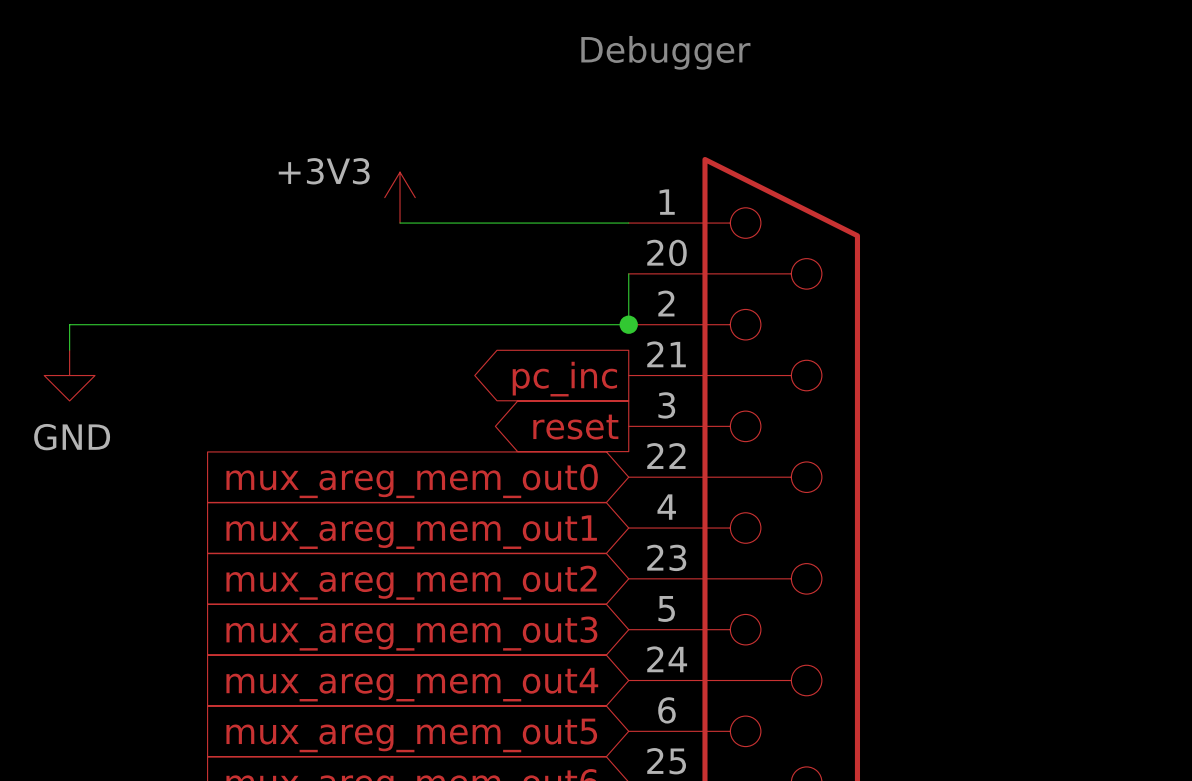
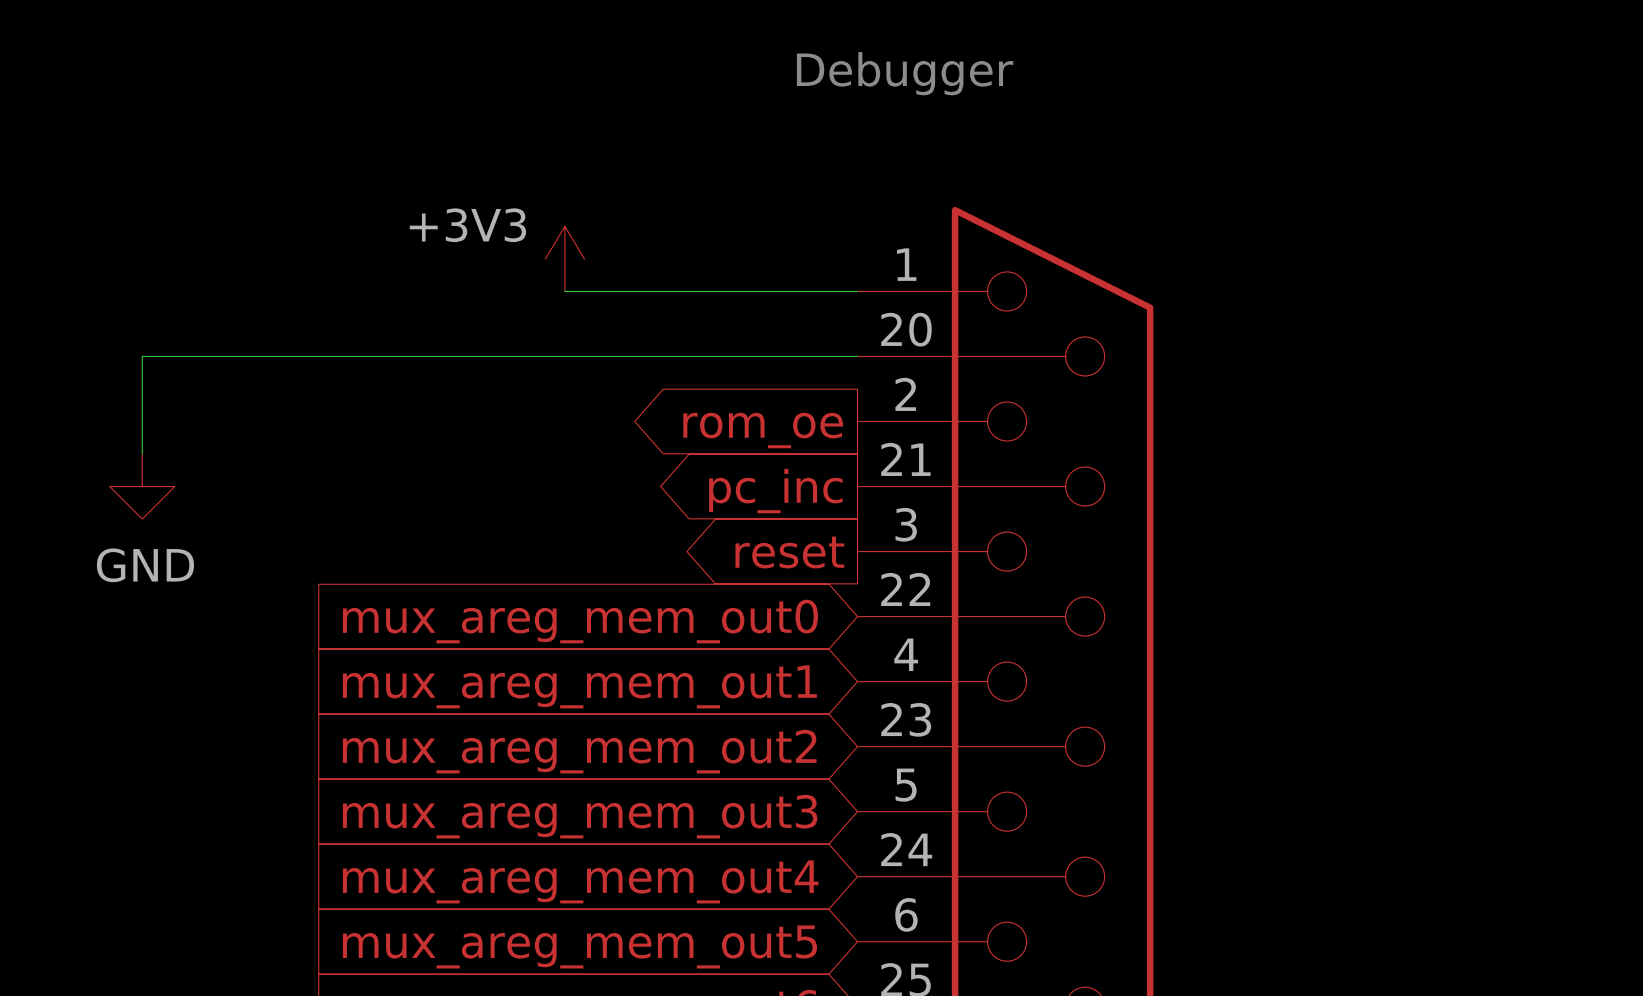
wire: (628, 273) (628, 324) (69, 324) -> (857, 356) (142, 356) (142, 421)
junction: (628, 324) -> none
global label: none -> rom_oe (763, 430)

